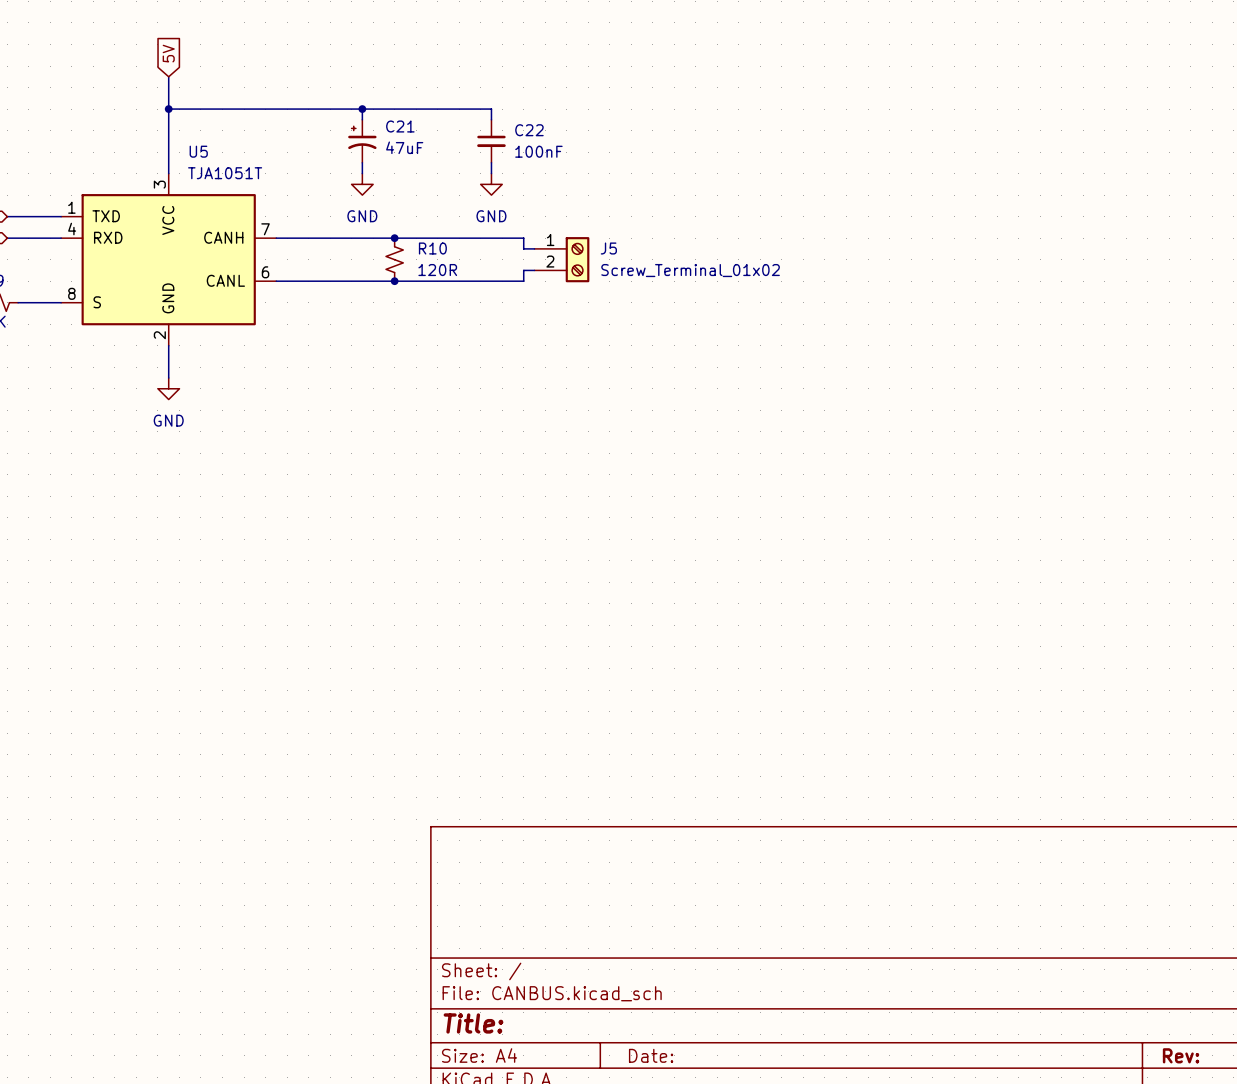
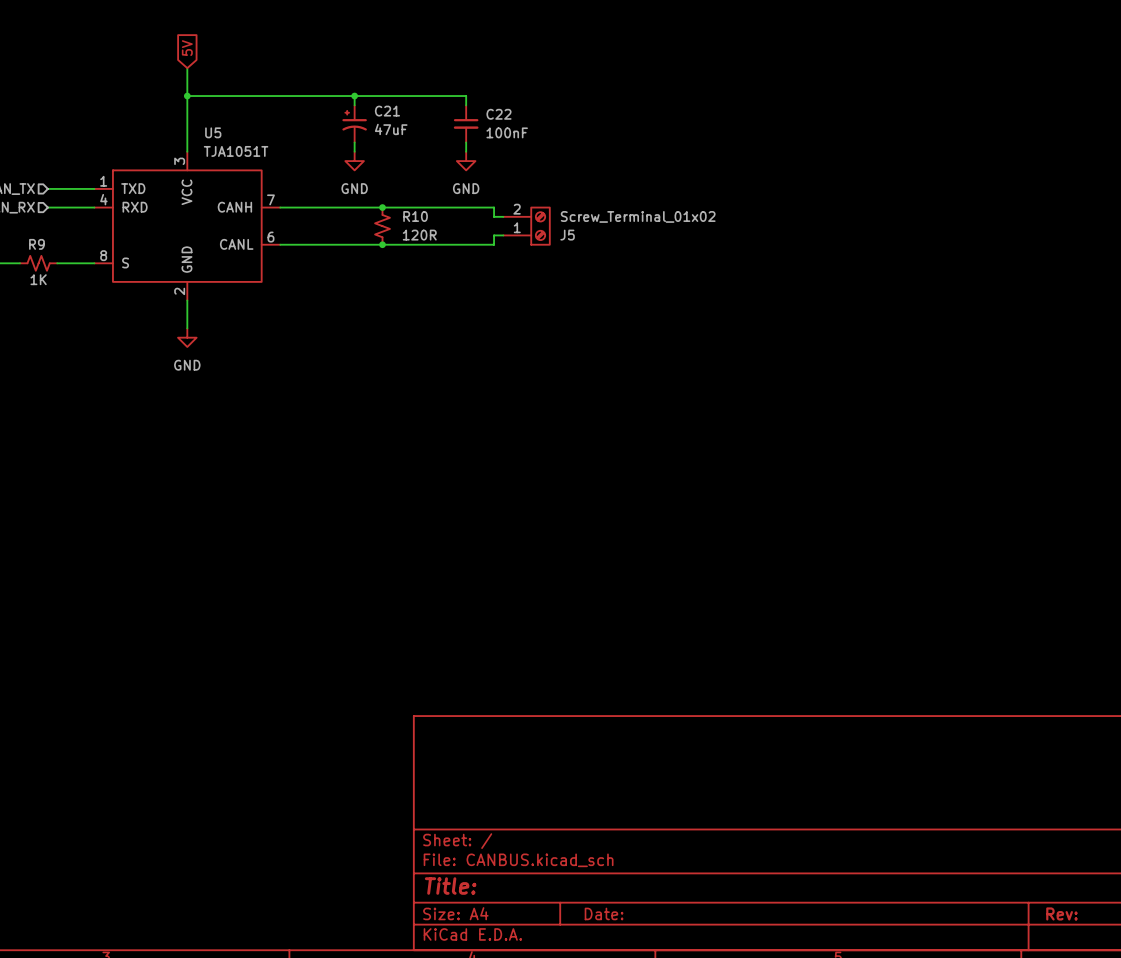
J5 flip: as is (577, 259) -> up-down (540, 226)

